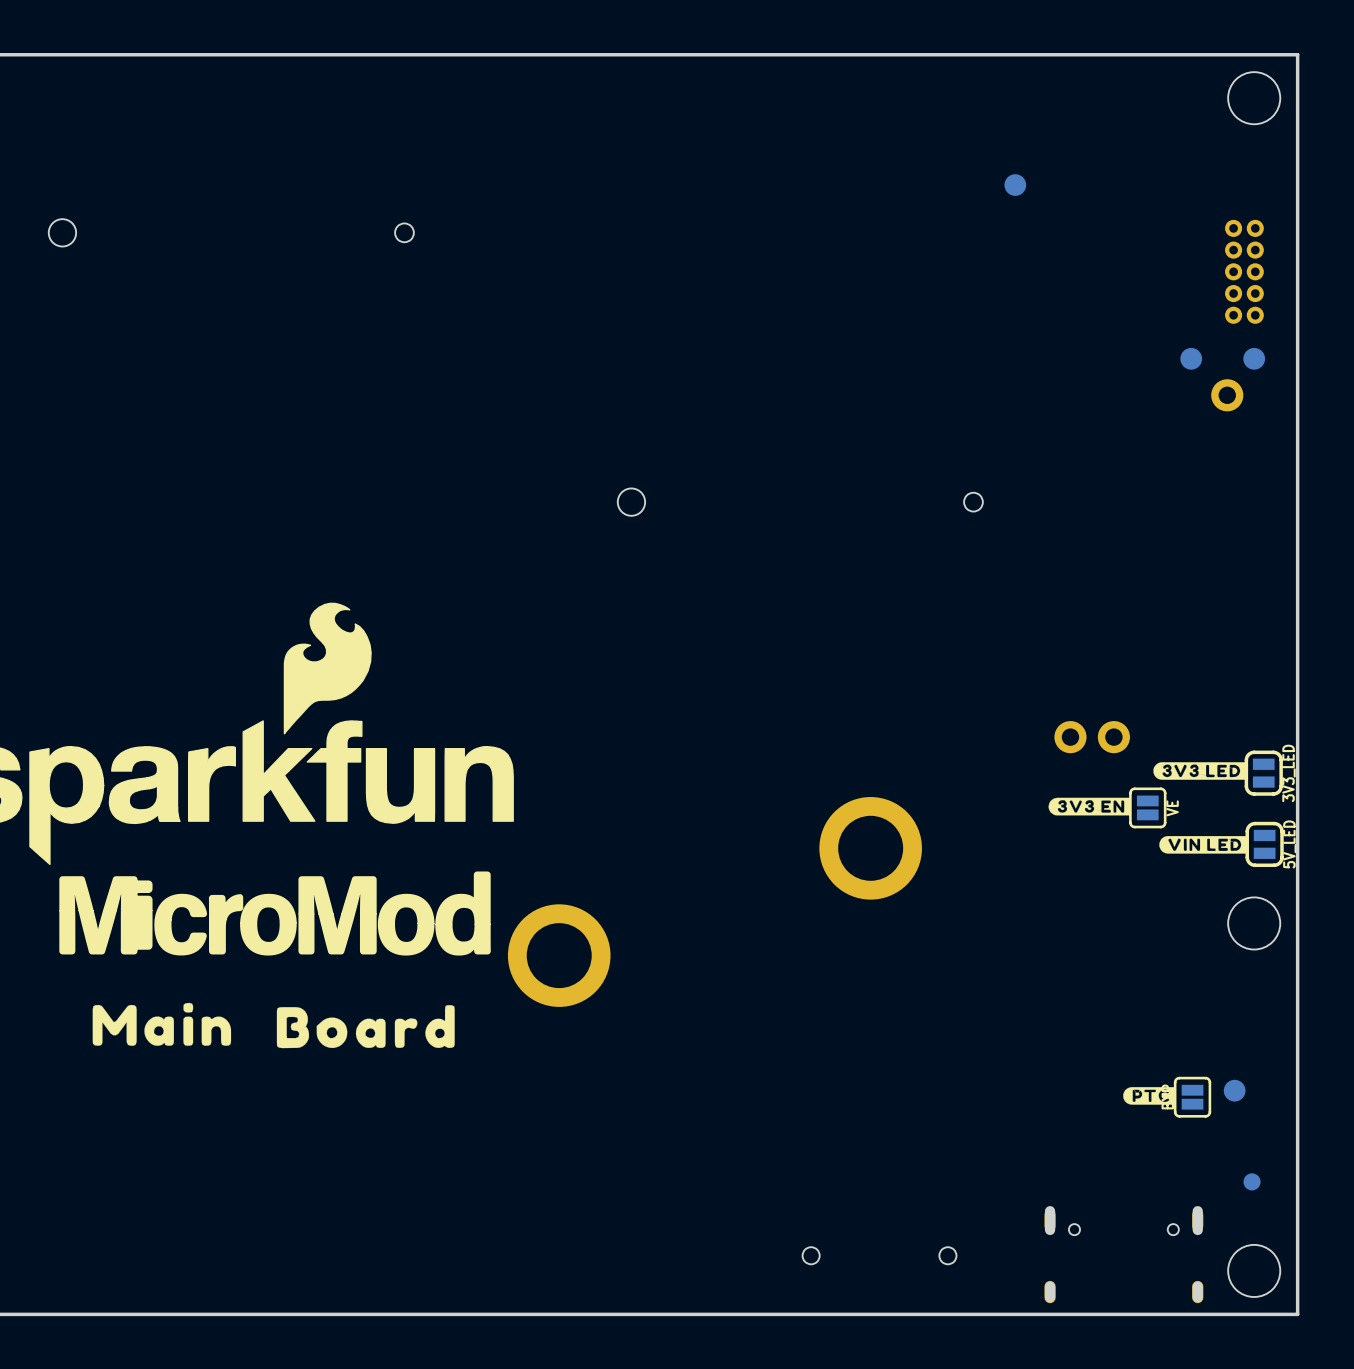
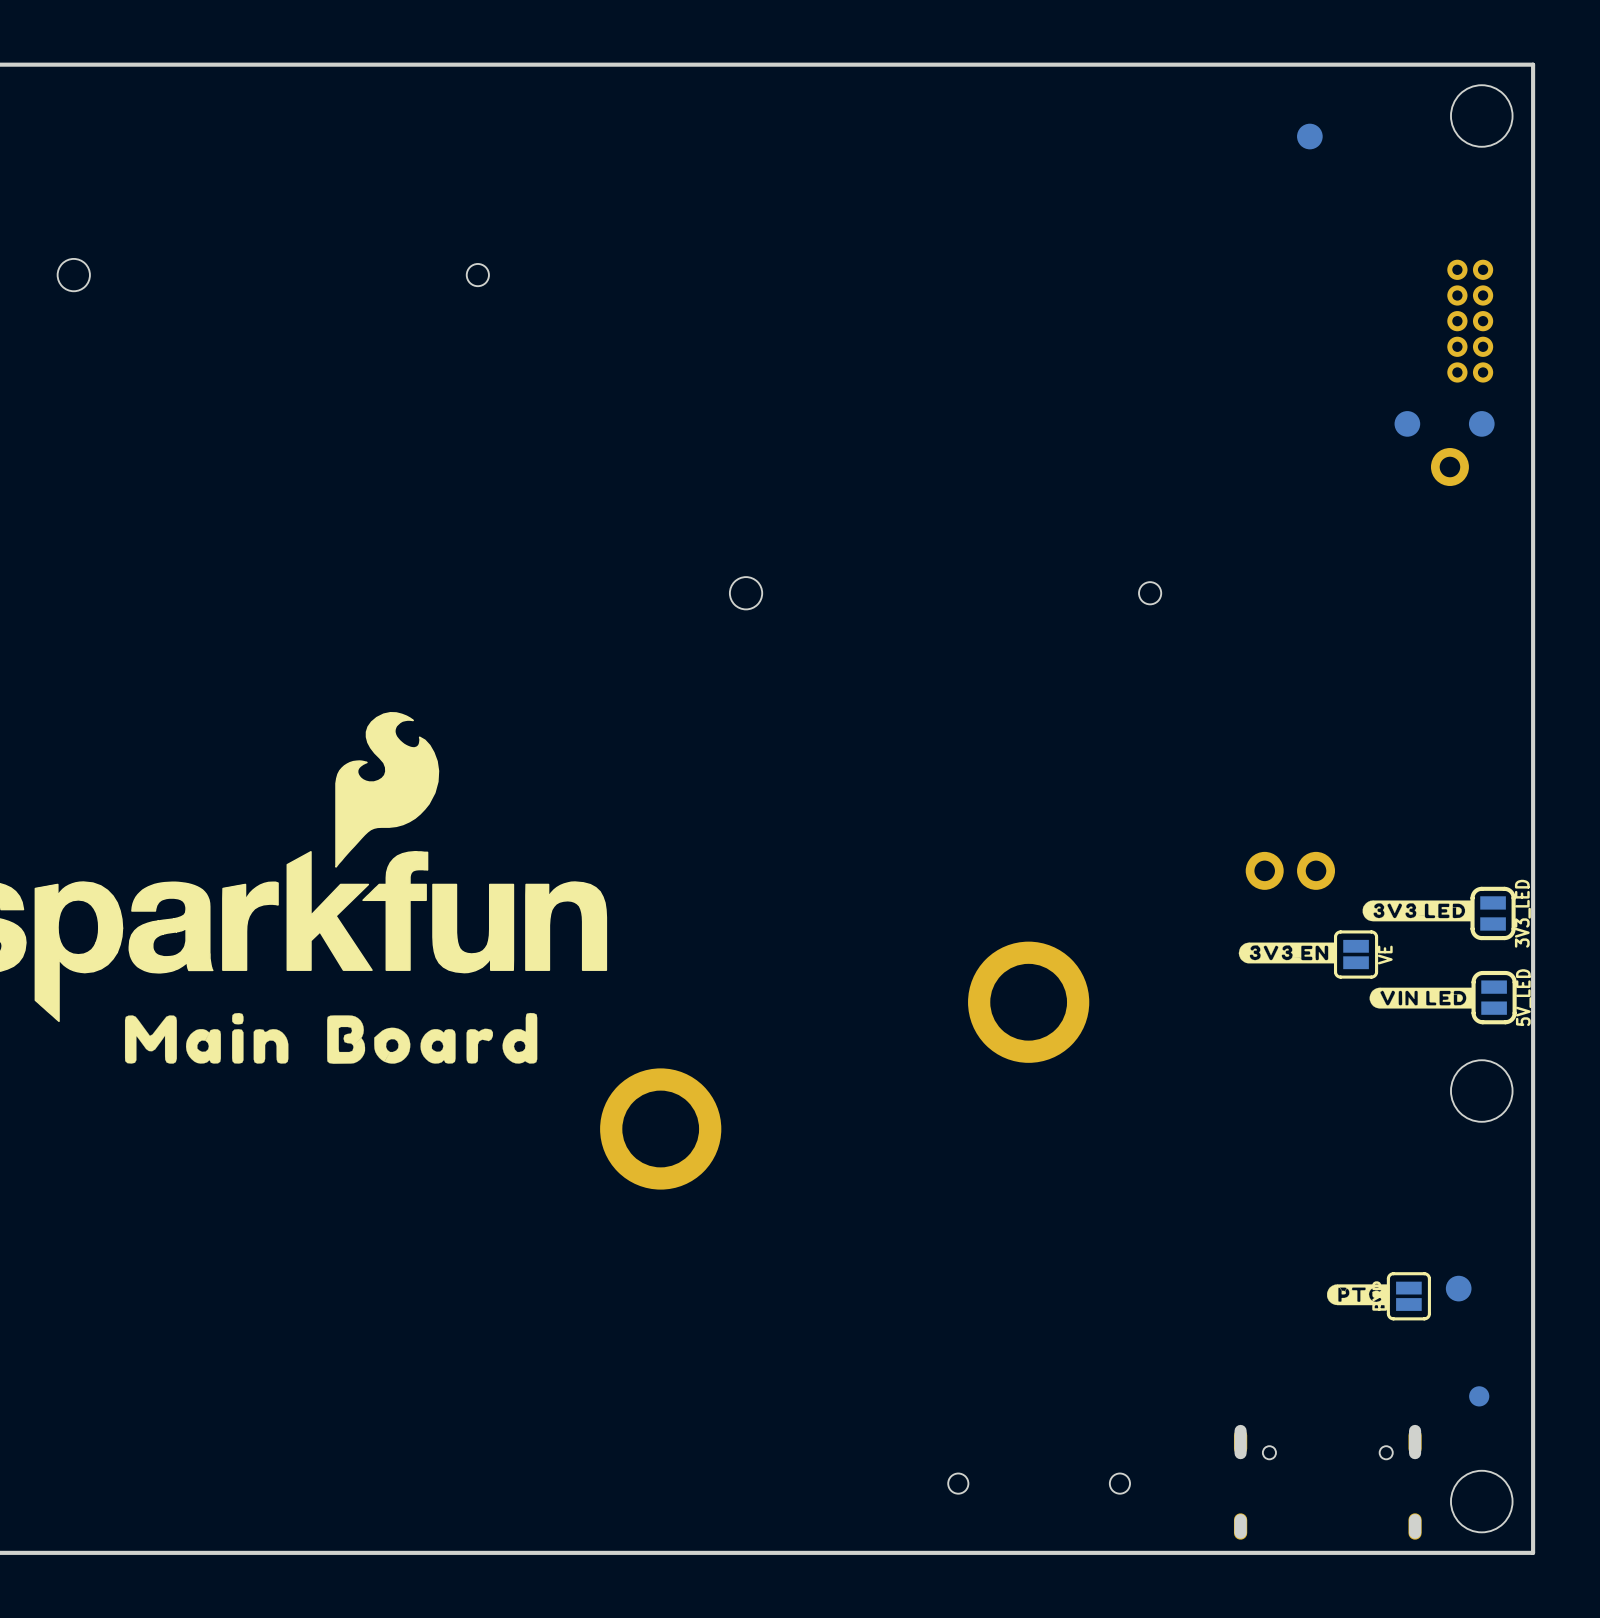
part position: (1015, 185) -> (1309, 136)
drawing: [59, 871, 491, 956] -> none
drawing position: (161, 1024) -> (206, 1038)
drawing position: (365, 1026) -> (432, 1038)

